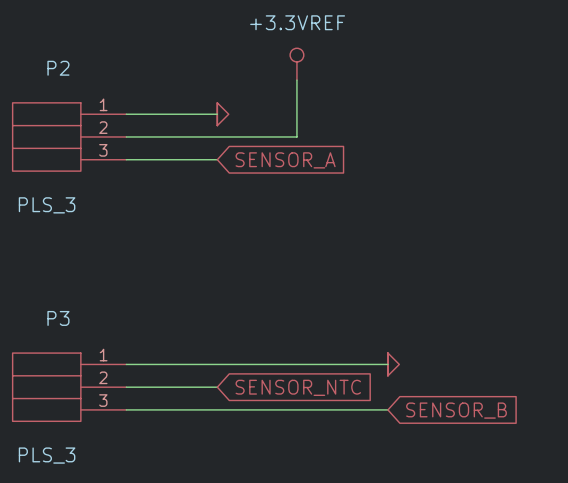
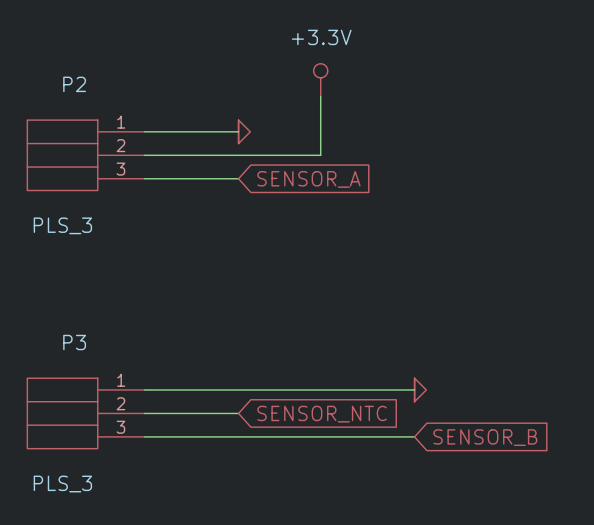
power symbol: +3.3VREF (296, 64) -> +3.3V (320, 80)

